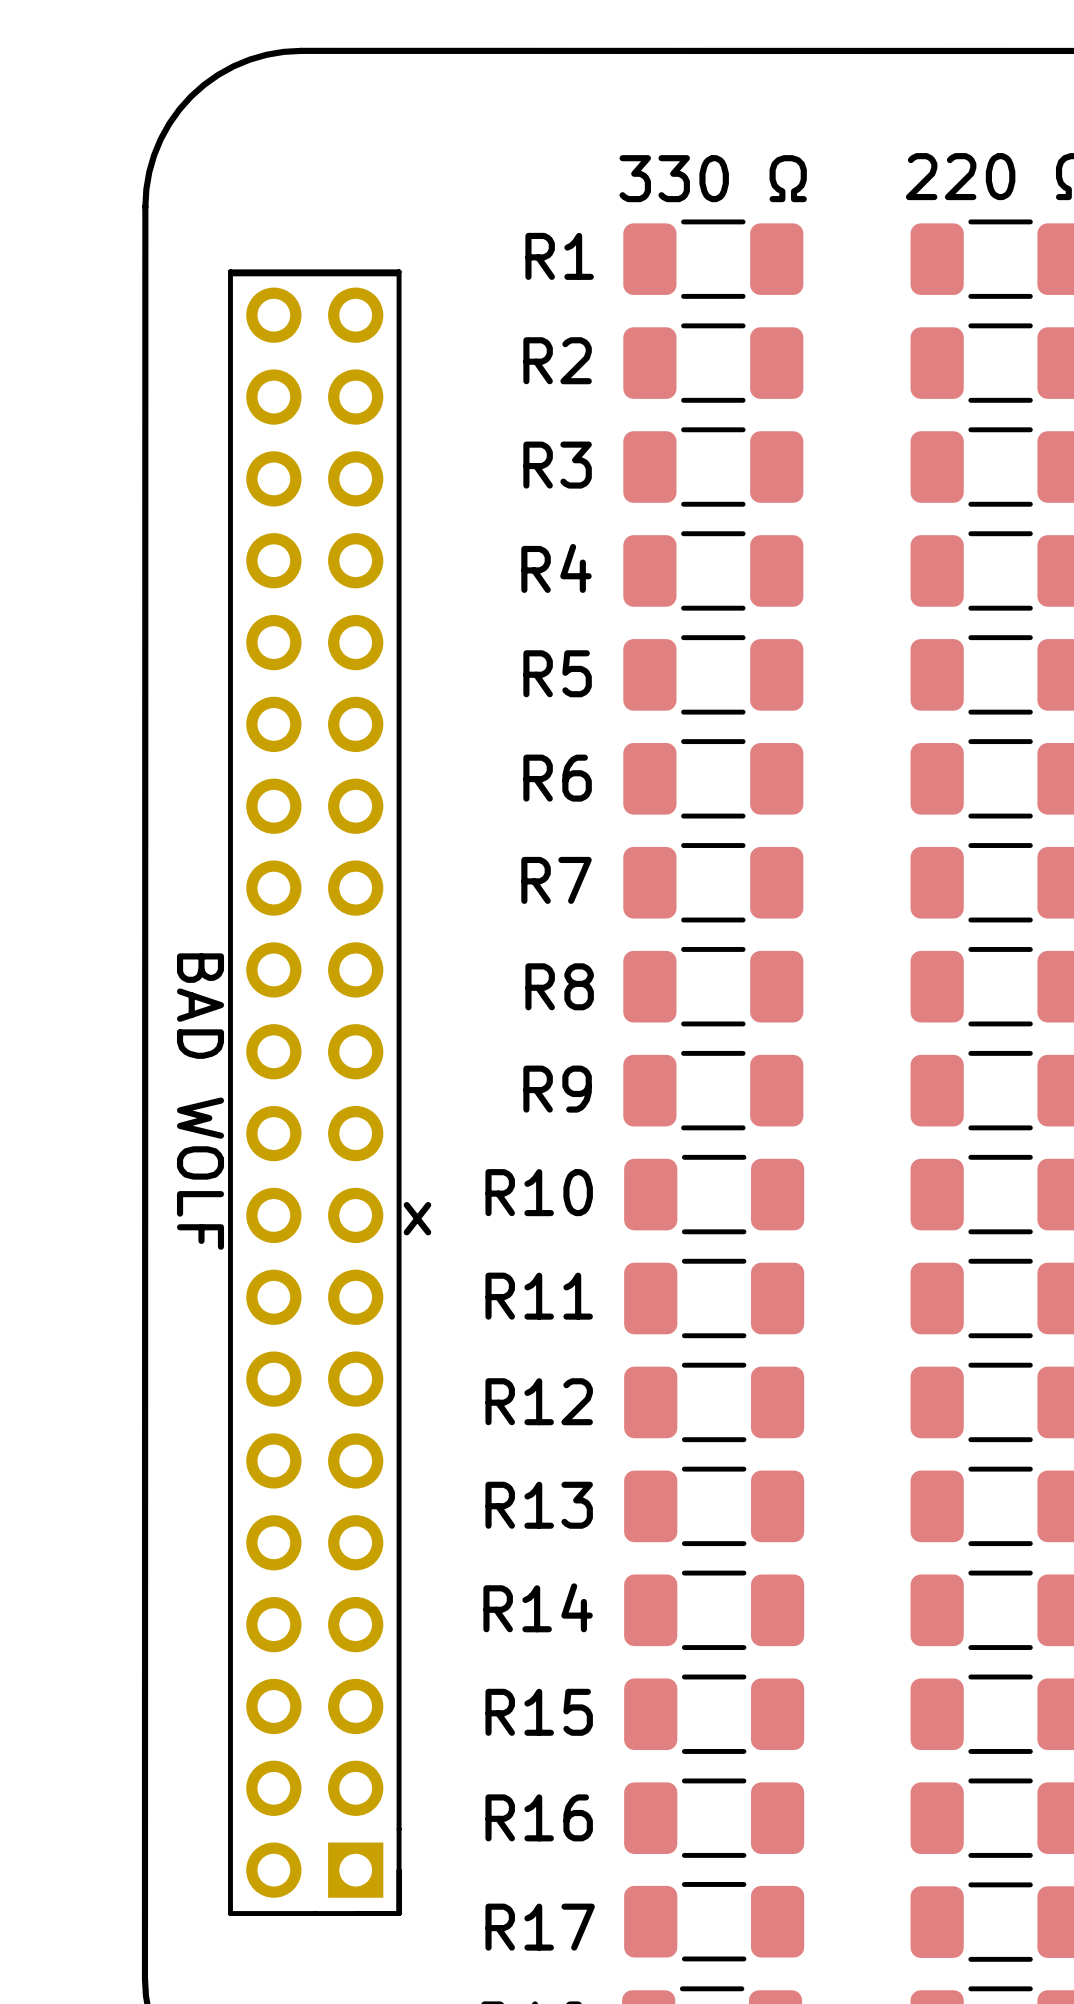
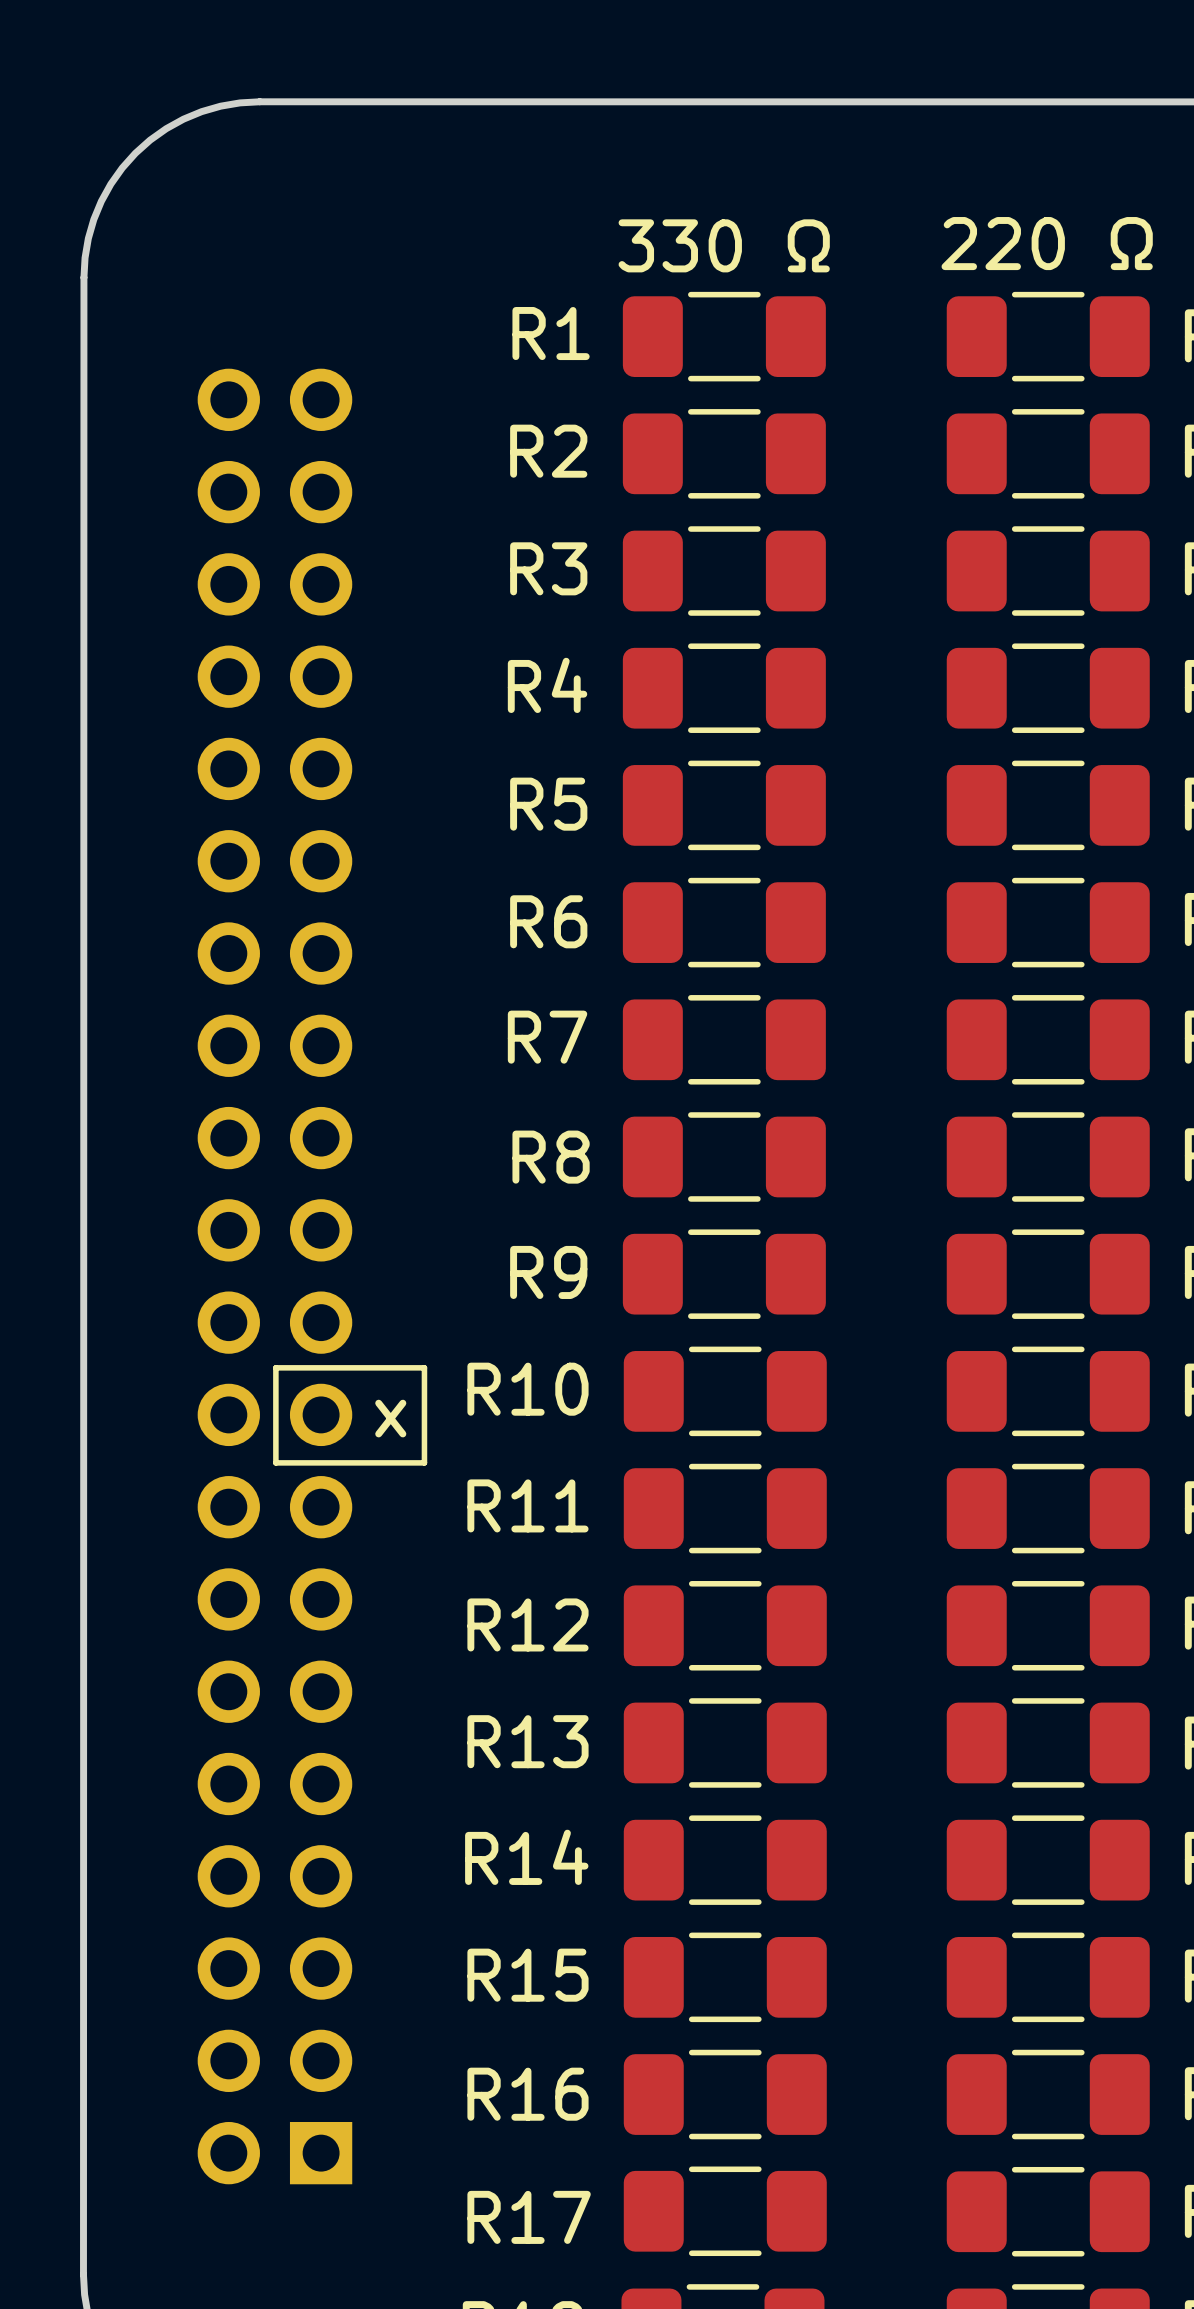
part footprint: [228, 269, 402, 1916] -> [197, 368, 353, 2185]
text: BAD WOLF (200, 1101) -> none
line: none -> (275, 1367) (424, 1367) (424, 1462) (275, 1462) (275, 1367)

